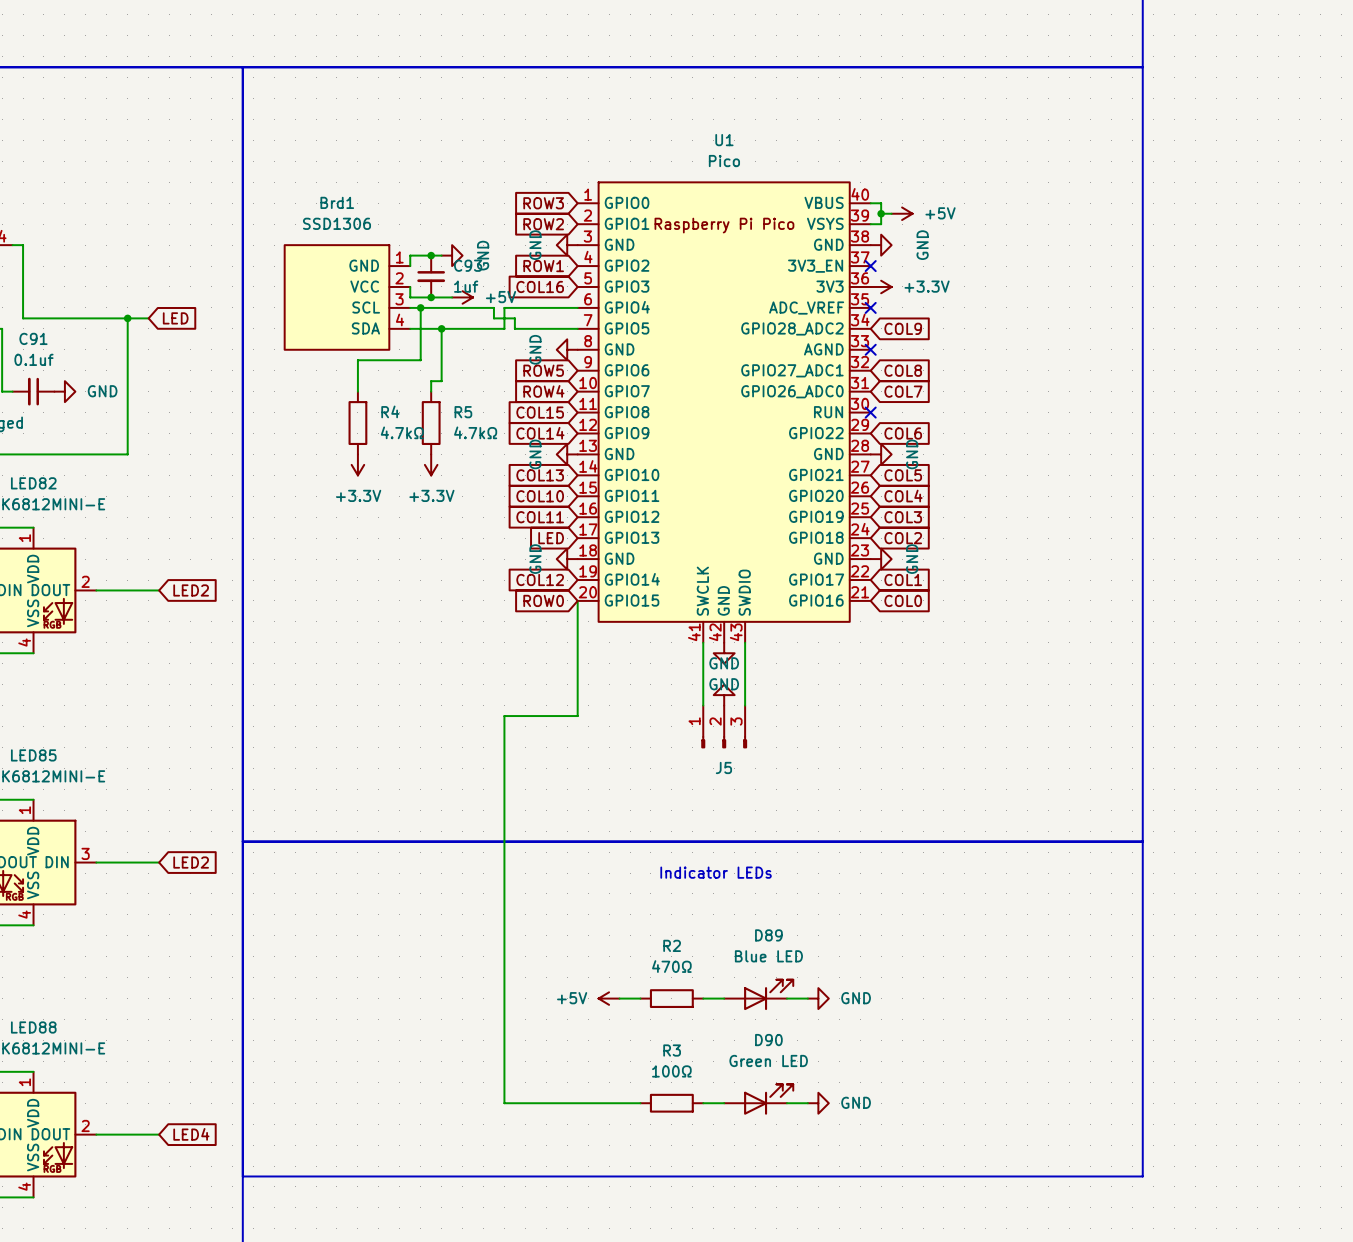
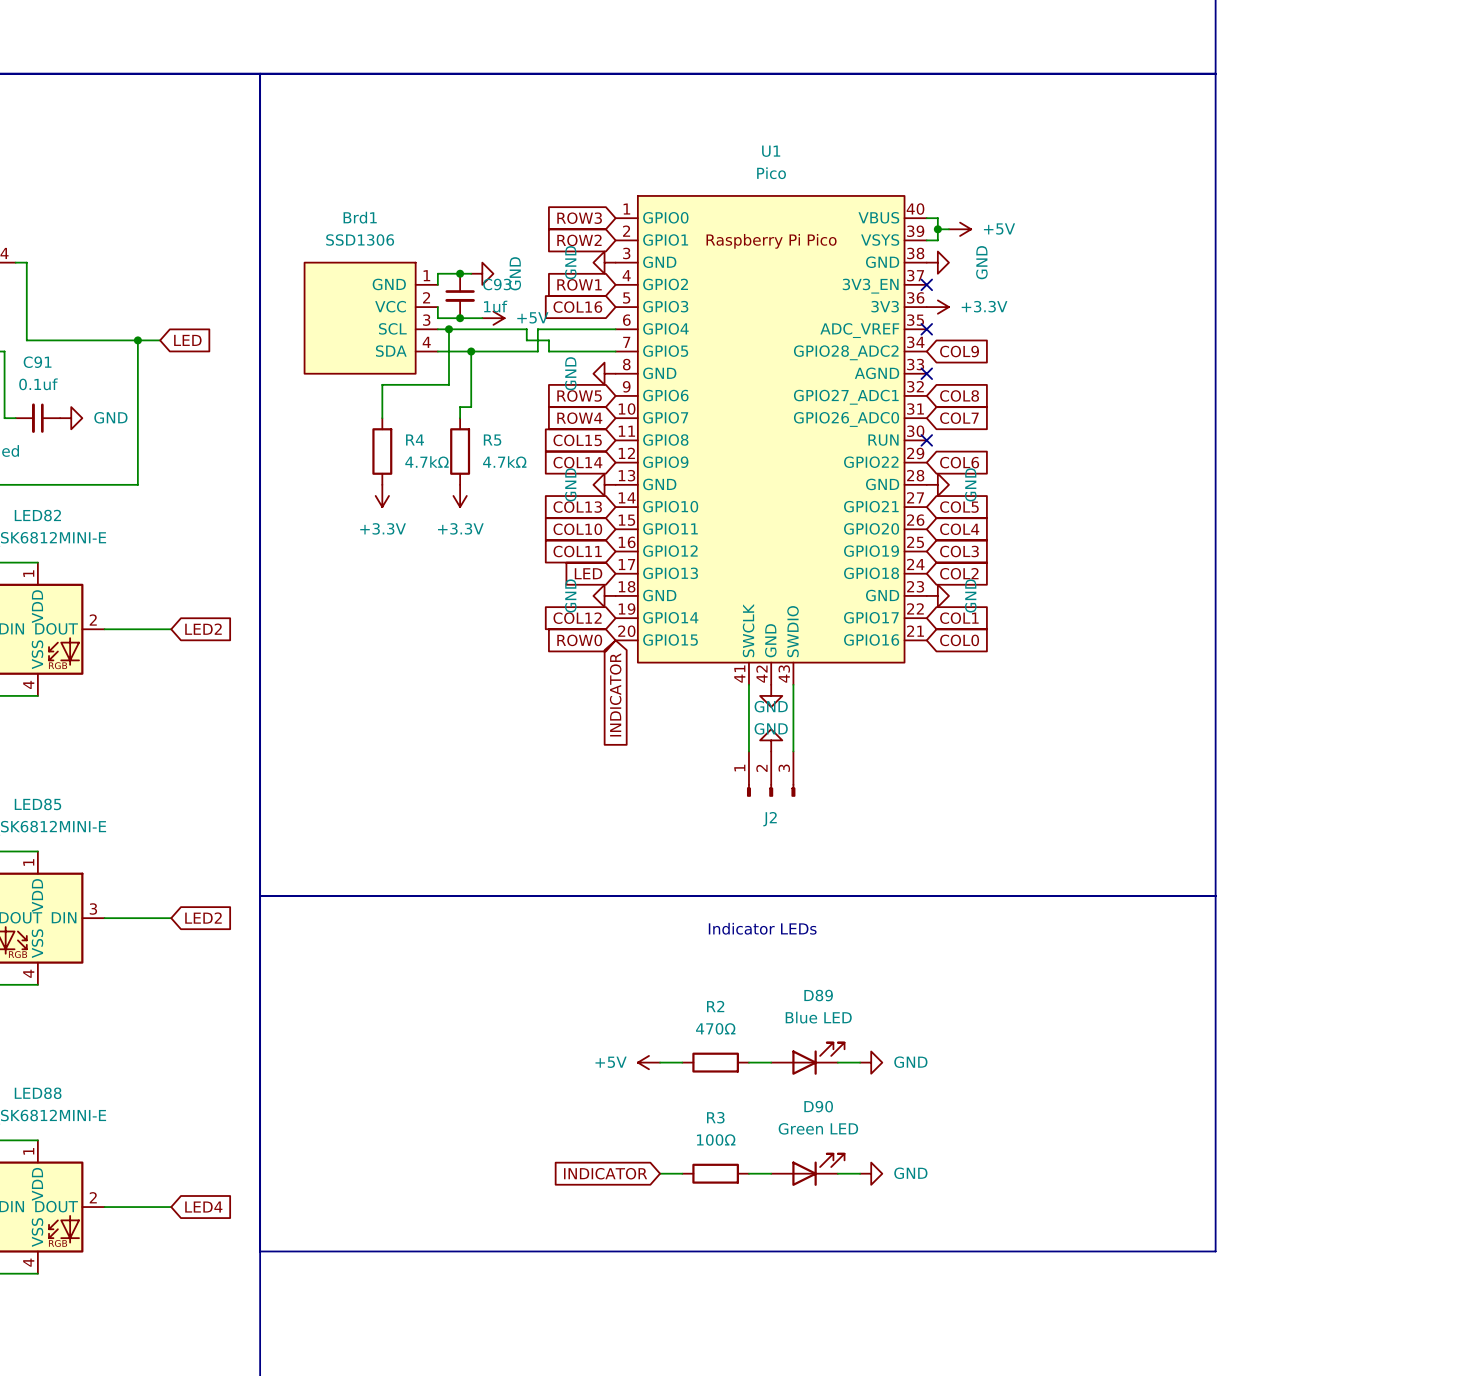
wire: (577, 600) (577, 716) (504, 716) (504, 1103) (619, 1103) -> none
global label: none -> INDICATOR (615, 694)
J5 name: J5 (723, 767) -> J2 (770, 819)
global label: none -> INDICATOR (605, 1173)

